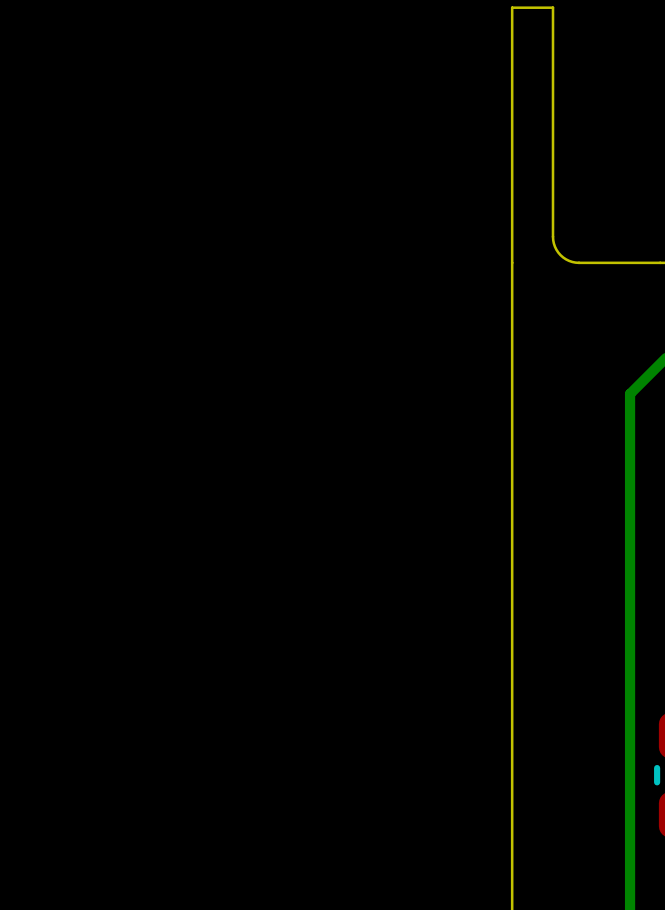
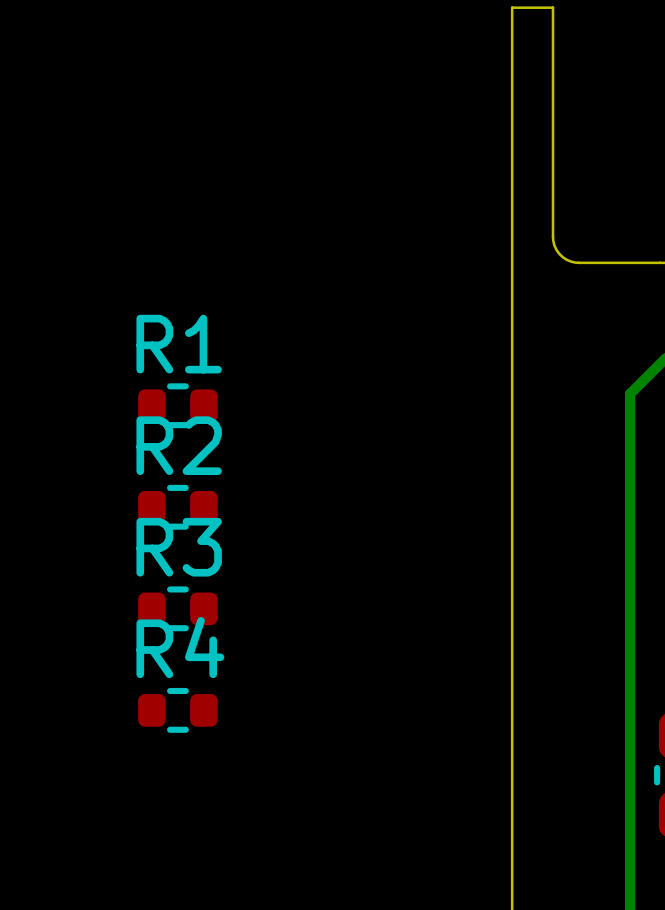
R1: none -> (177, 405)
R2: none -> (177, 507)
R3: none -> (177, 608)
R4: none -> (177, 710)

